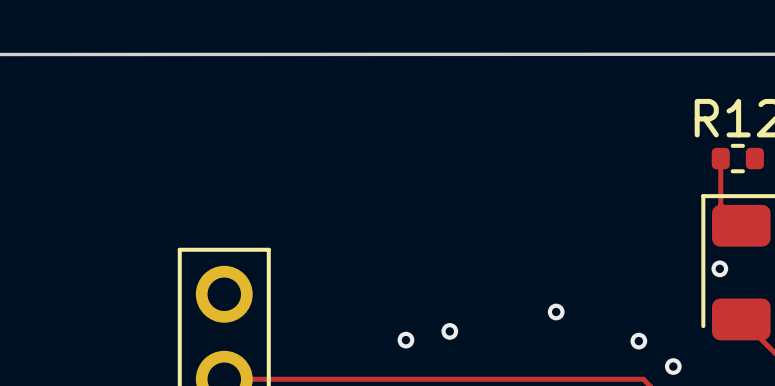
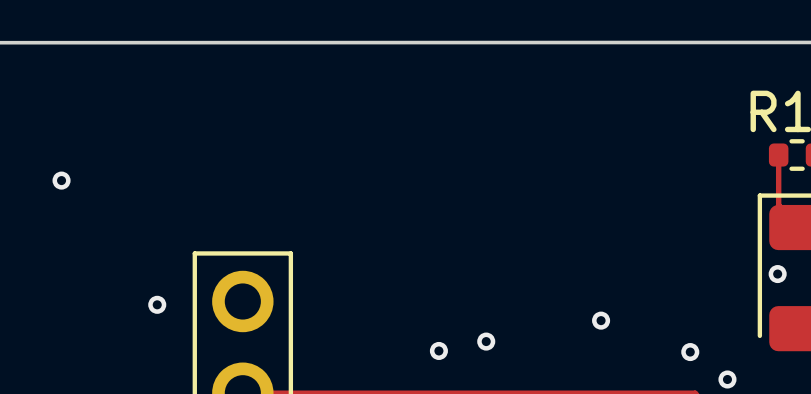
via: none -> (61, 180)
via: none -> (157, 304)

